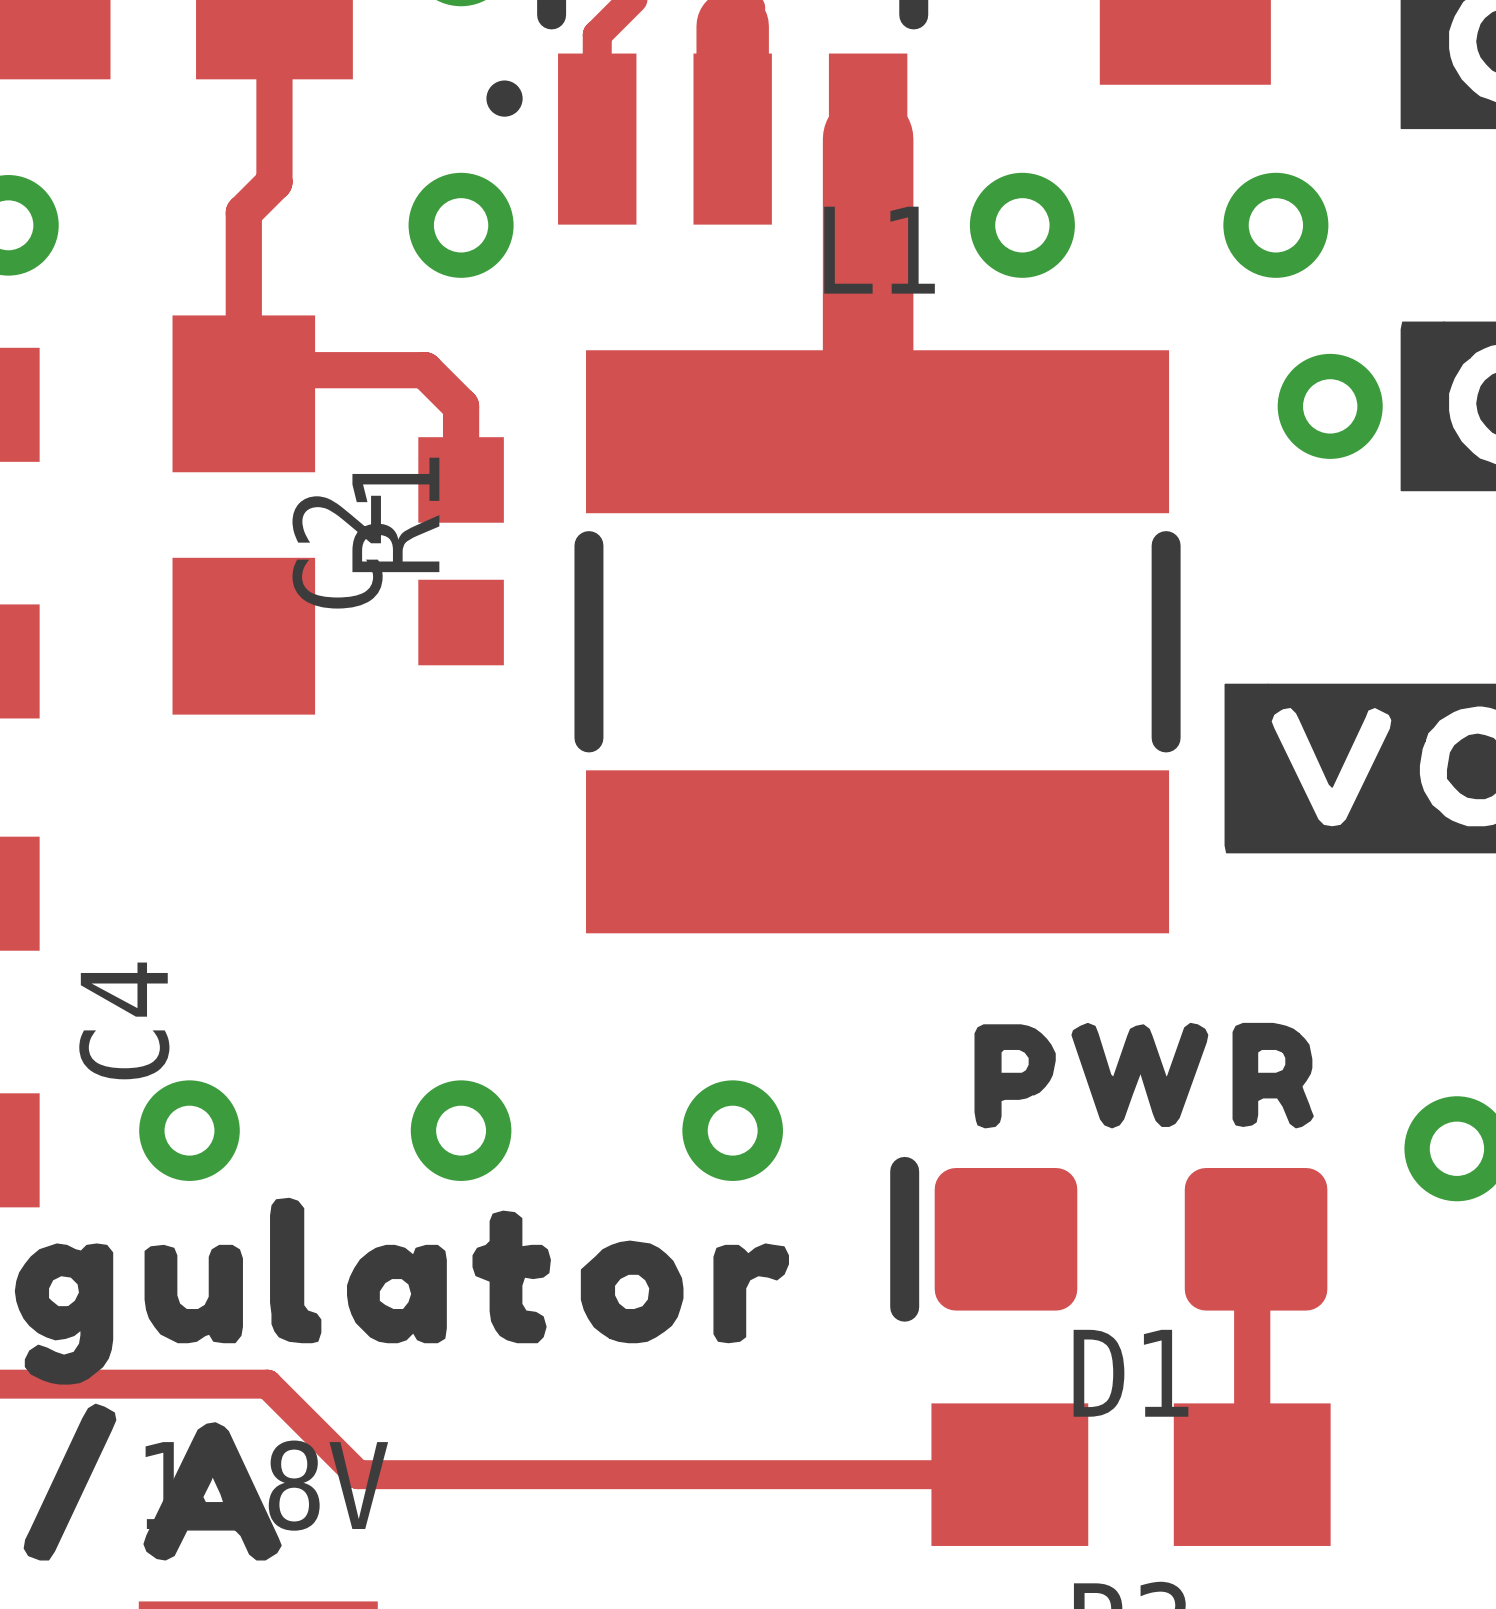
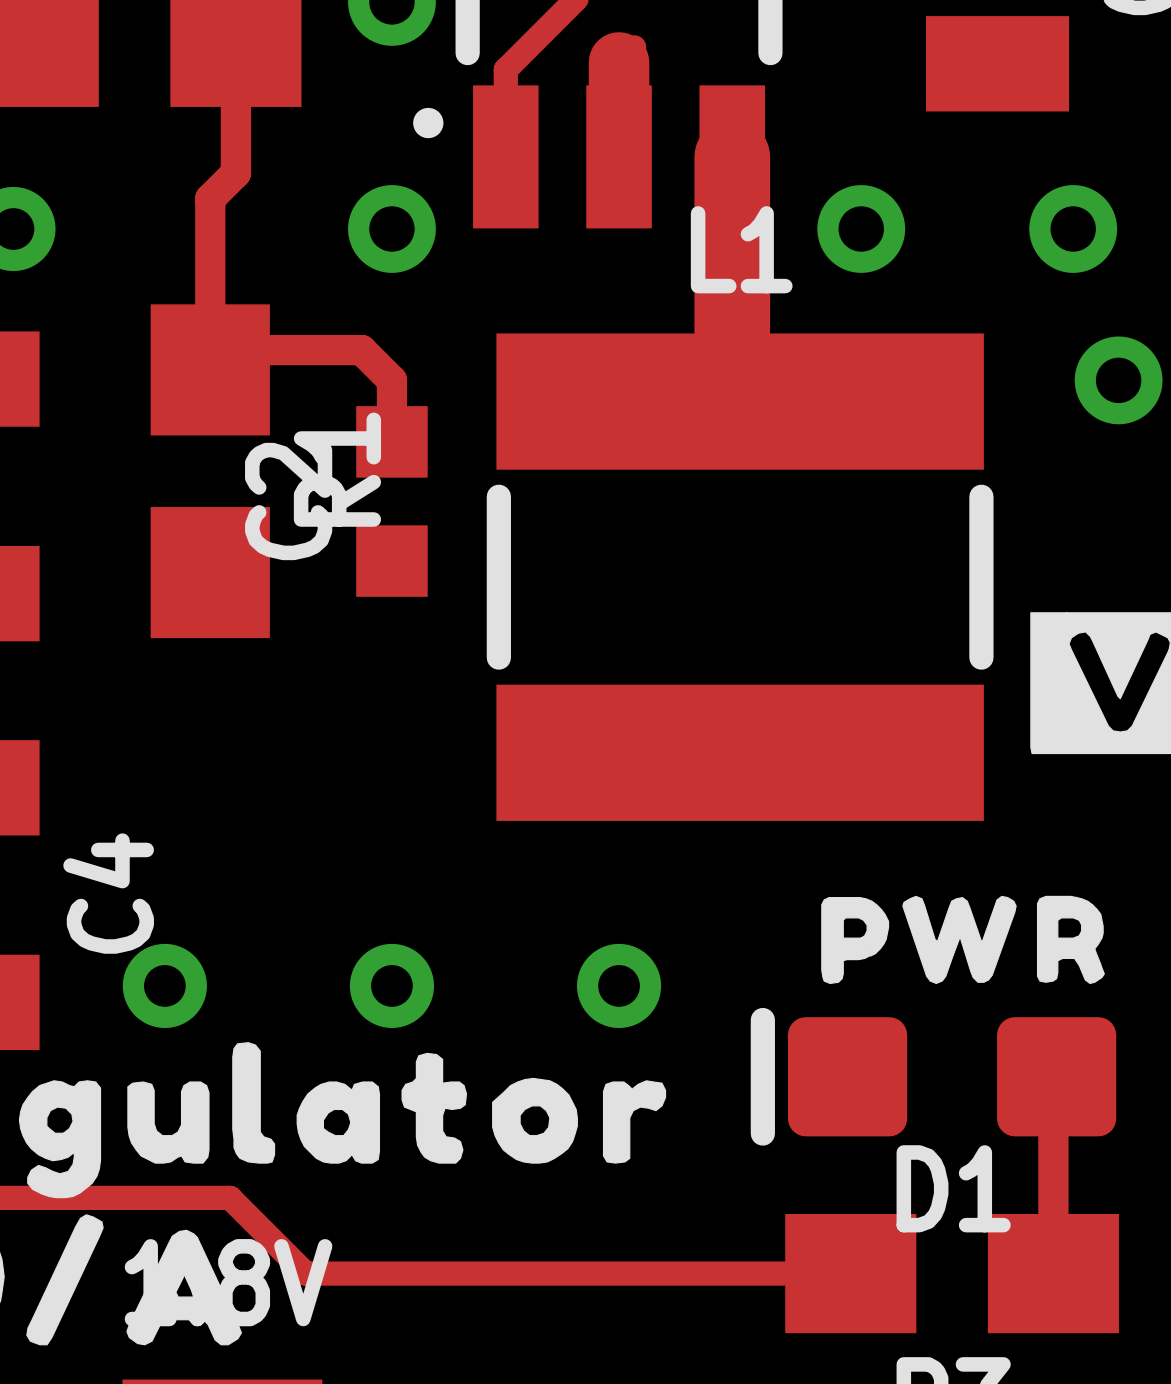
track: (274, 158) (274, 182) (243, 212) -> (235, 173) (210, 198) (210, 218)

